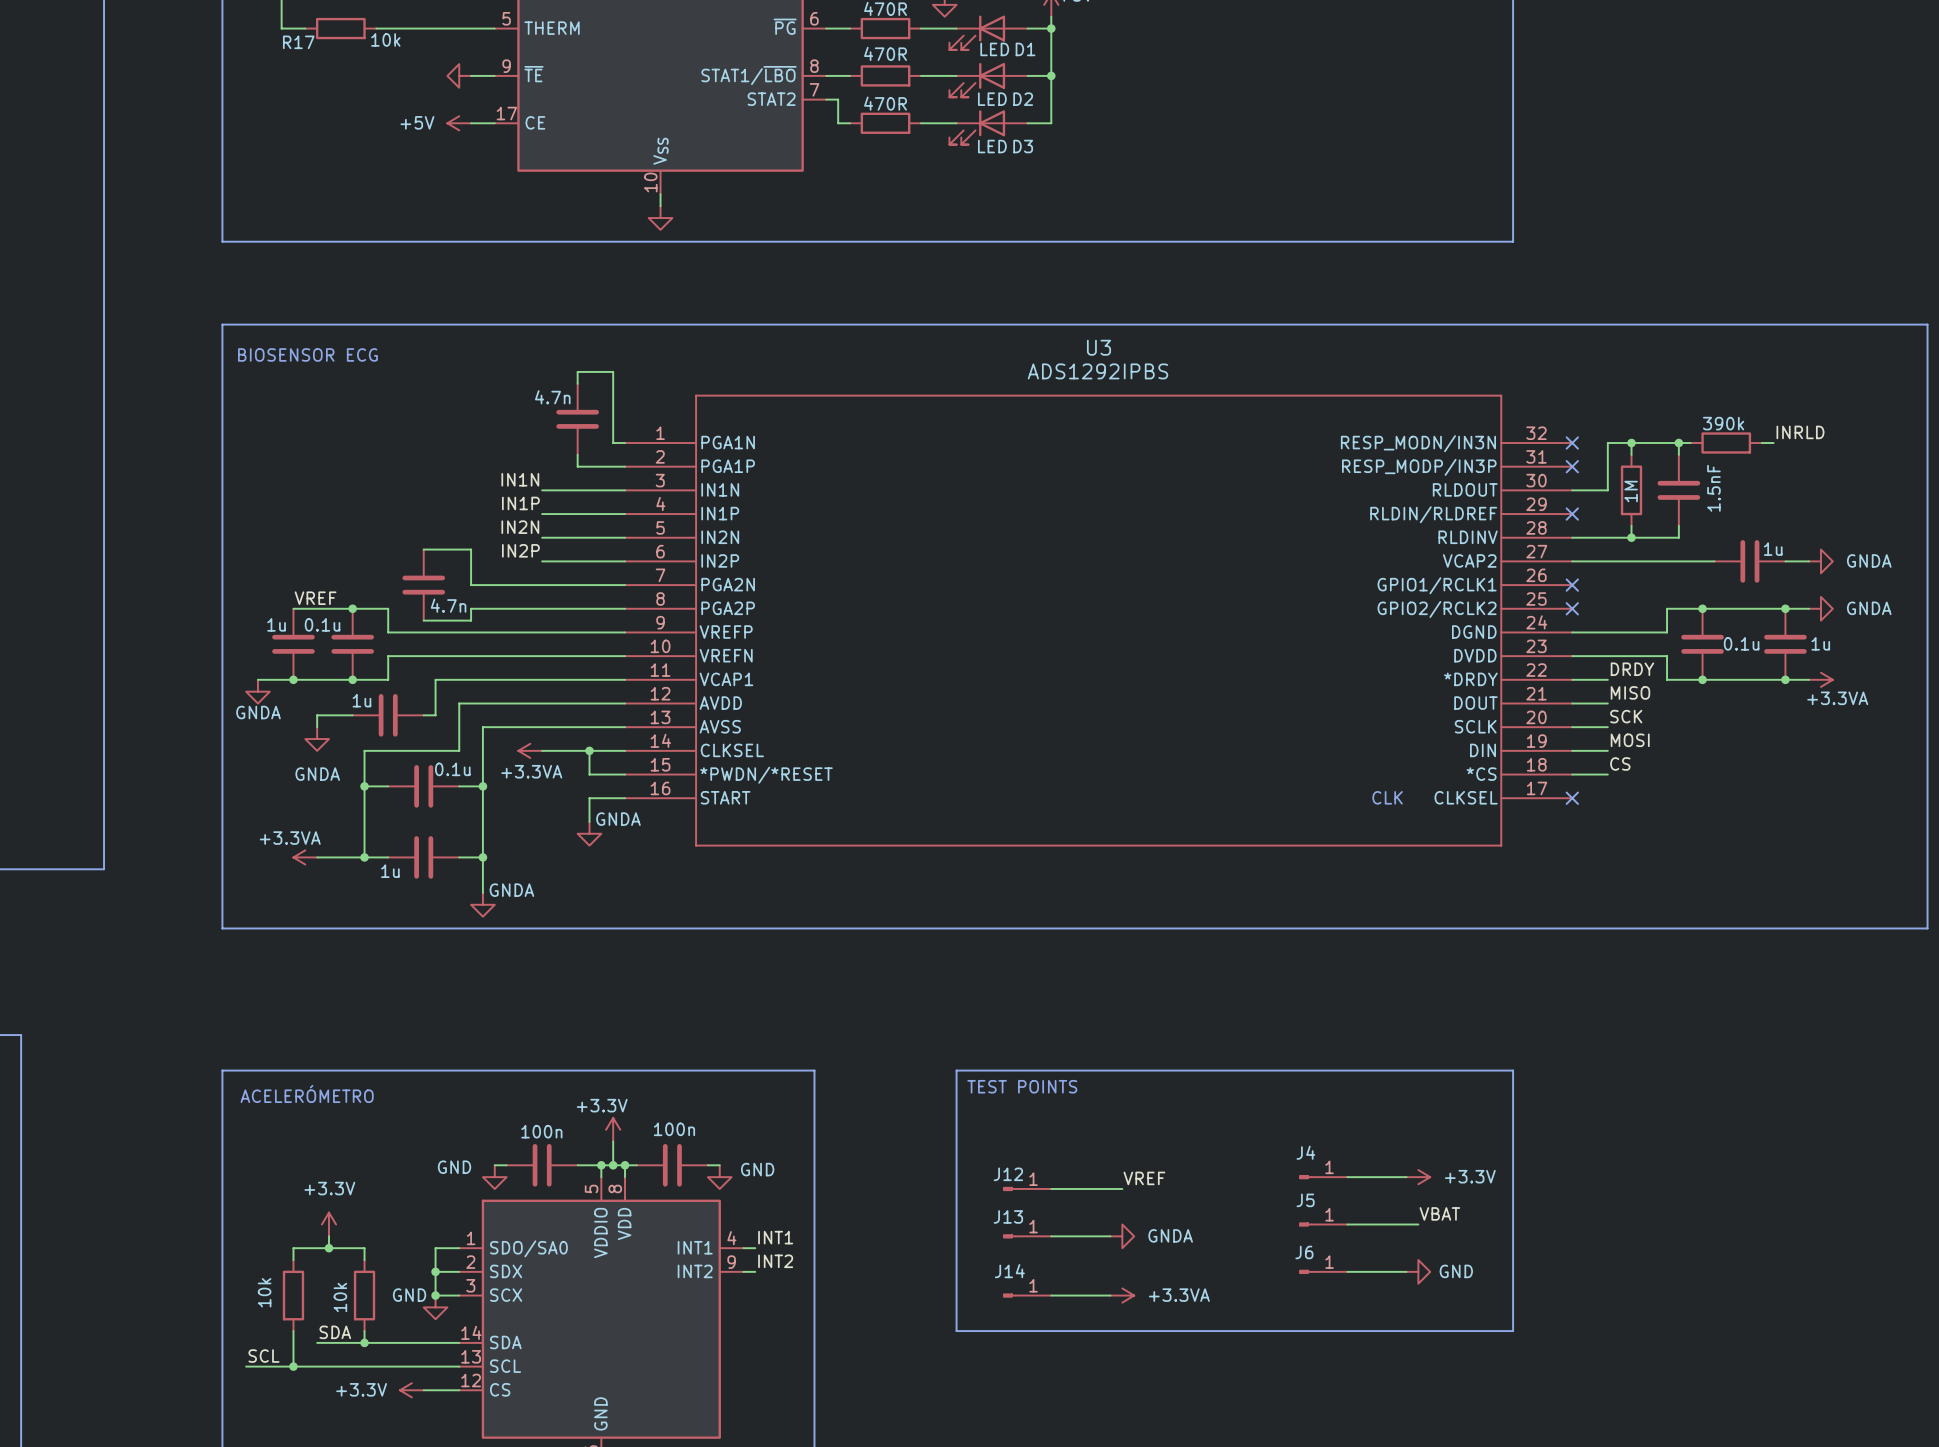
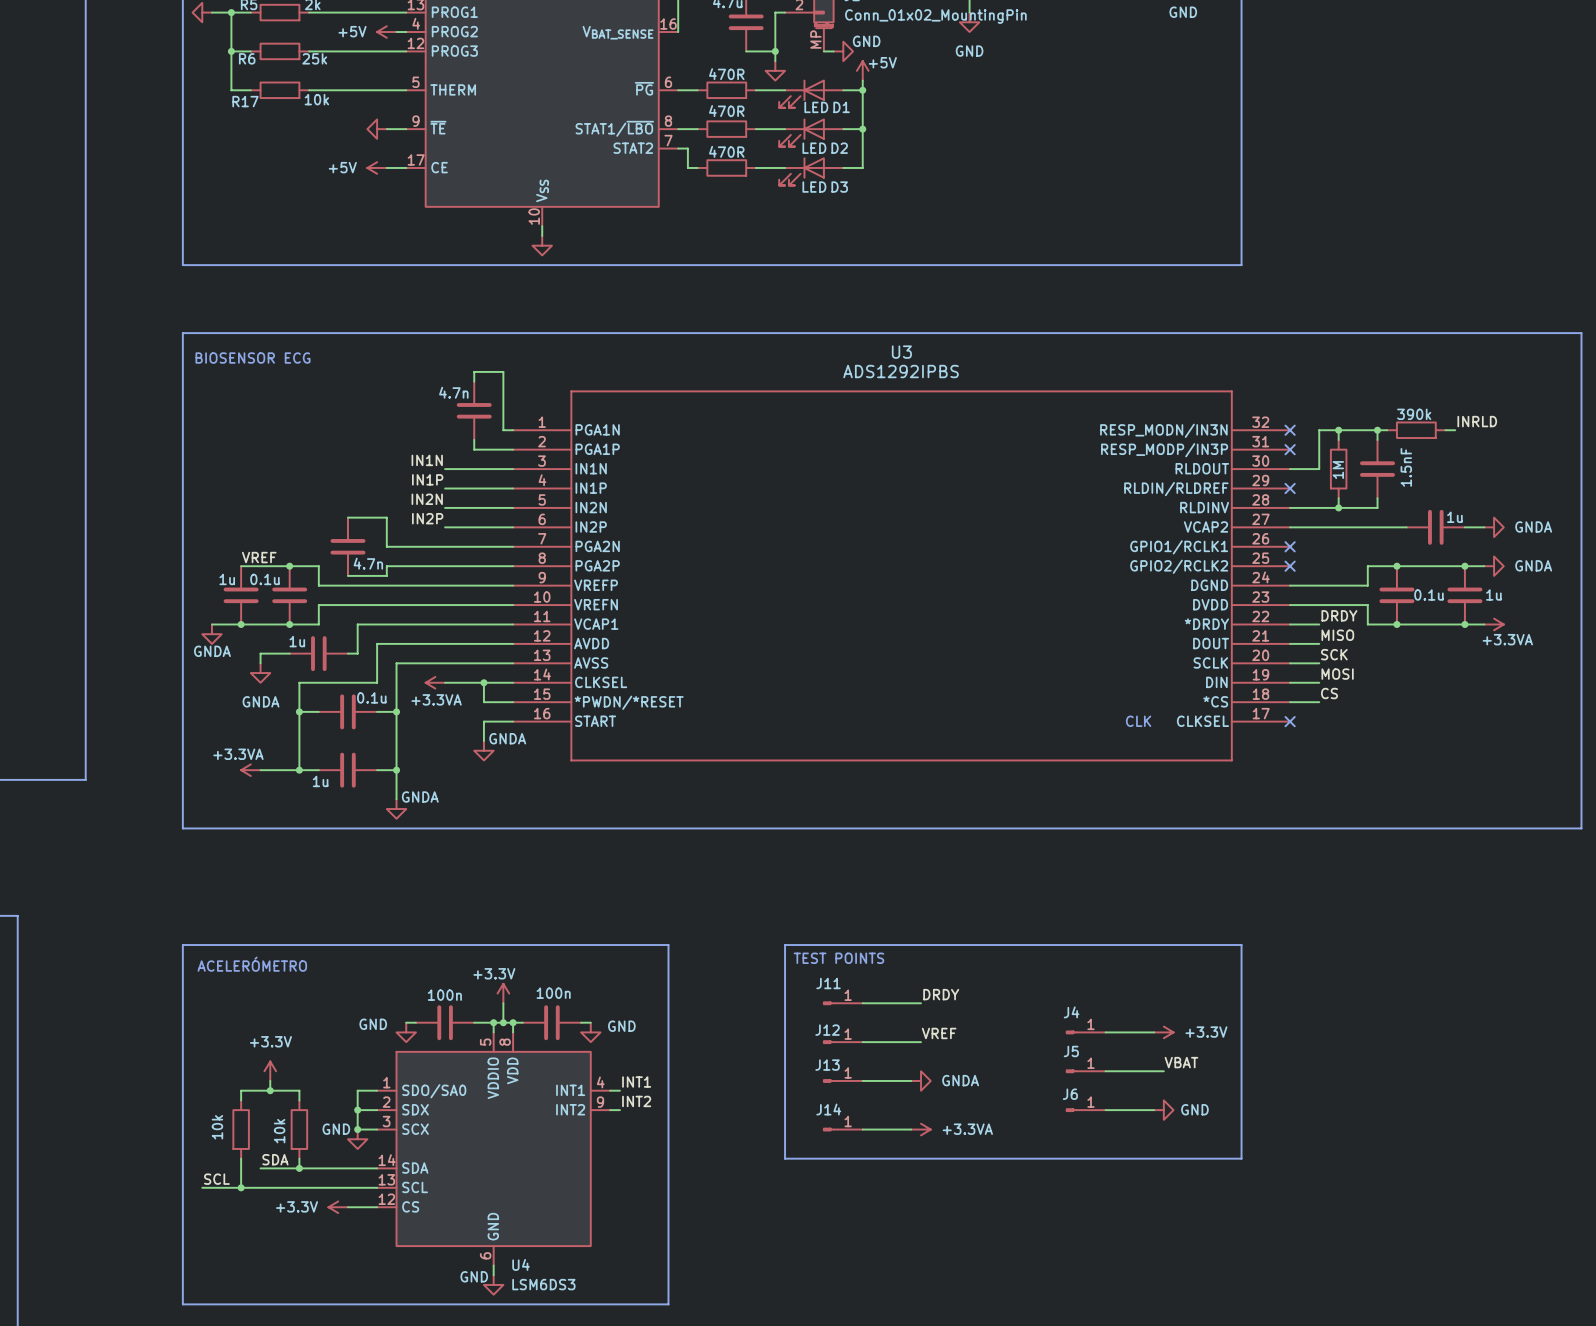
label: none -> DRDY (941, 994)
J11: none -> (843, 1003)
wire: none -> (862, 1003) (921, 1003)

